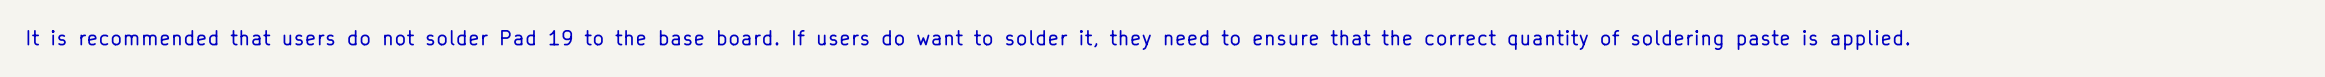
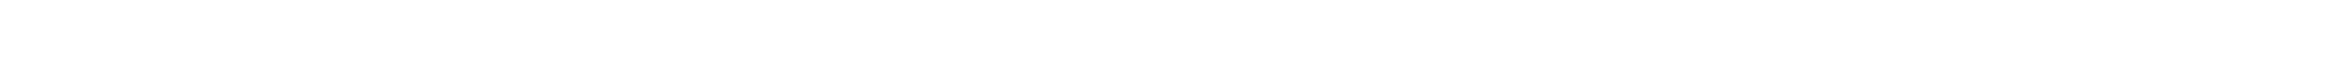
text: It is recommended that users do not solder Pad 19 to the base board. If users do want to solder it, they need to ensure that the correct quantity of soldering paste is applied. (968, 39) -> none

